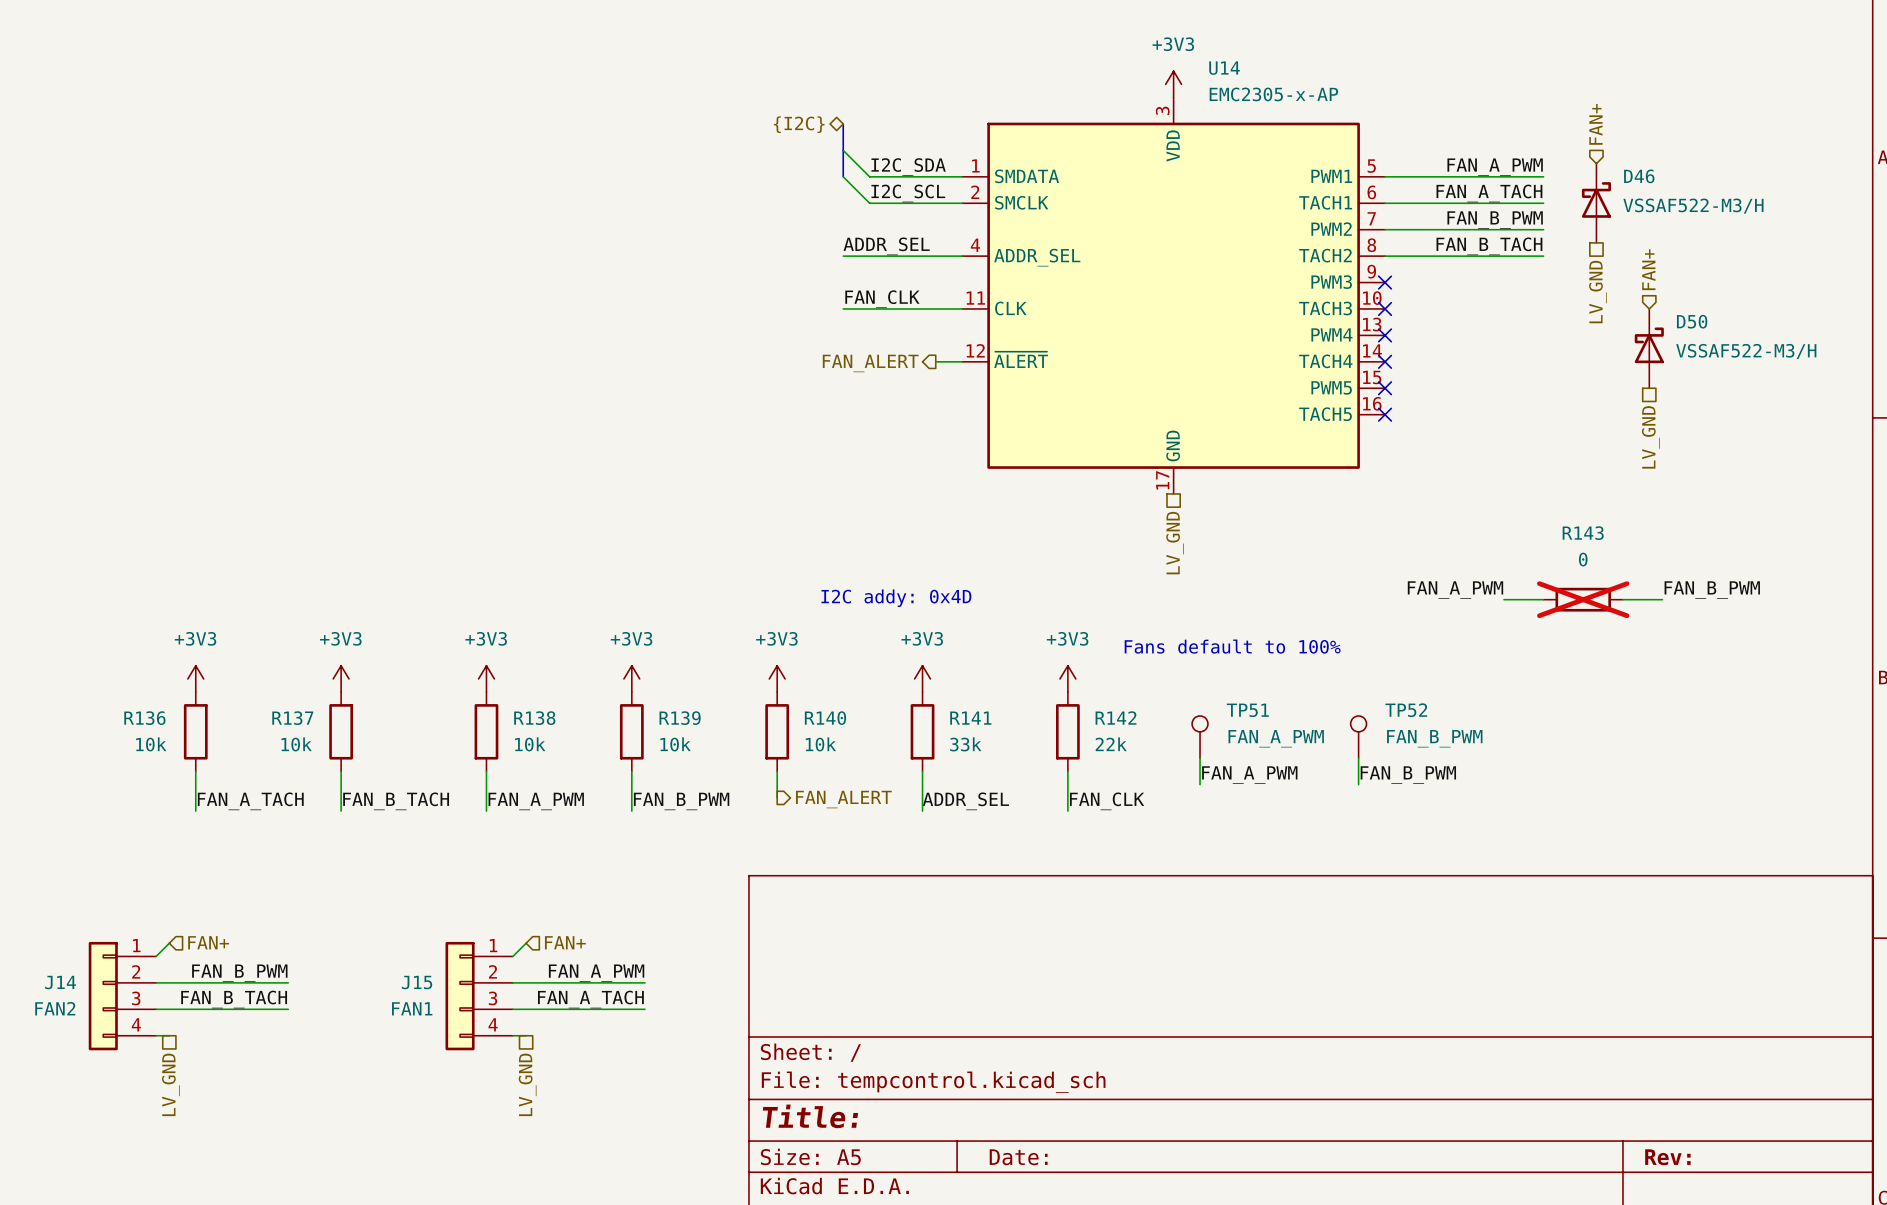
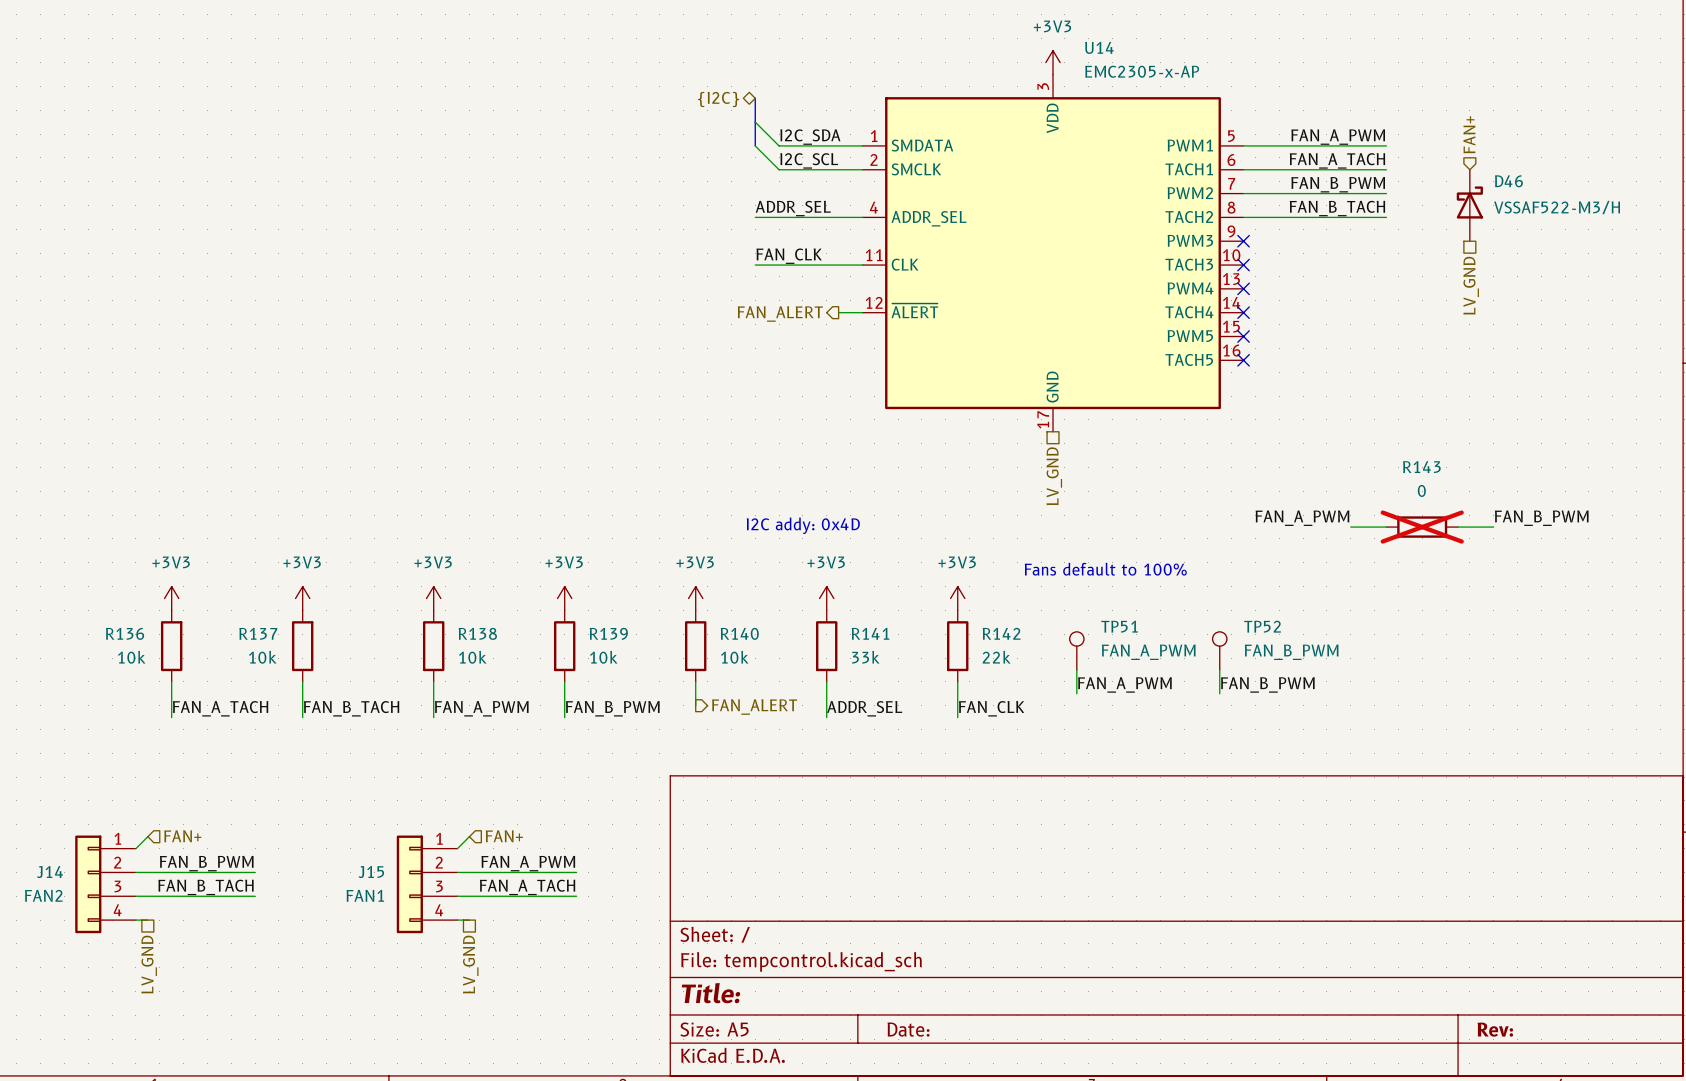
hierarchical label: FAN+ (1595, 124) -> none
hierarchical label: none -> FAN+ (1469, 134)
D46 position: (1596, 203) -> (1469, 205)
hierarchical label: FAN+ (1648, 269) -> none
hierarchical label: LV_GND (1597, 292) -> none
hierarchical label: none -> LV_GND (1471, 285)
D50: VSSAF522-M3/H (1649, 348) -> none
hierarchical label: LV_GND (1650, 437) -> none

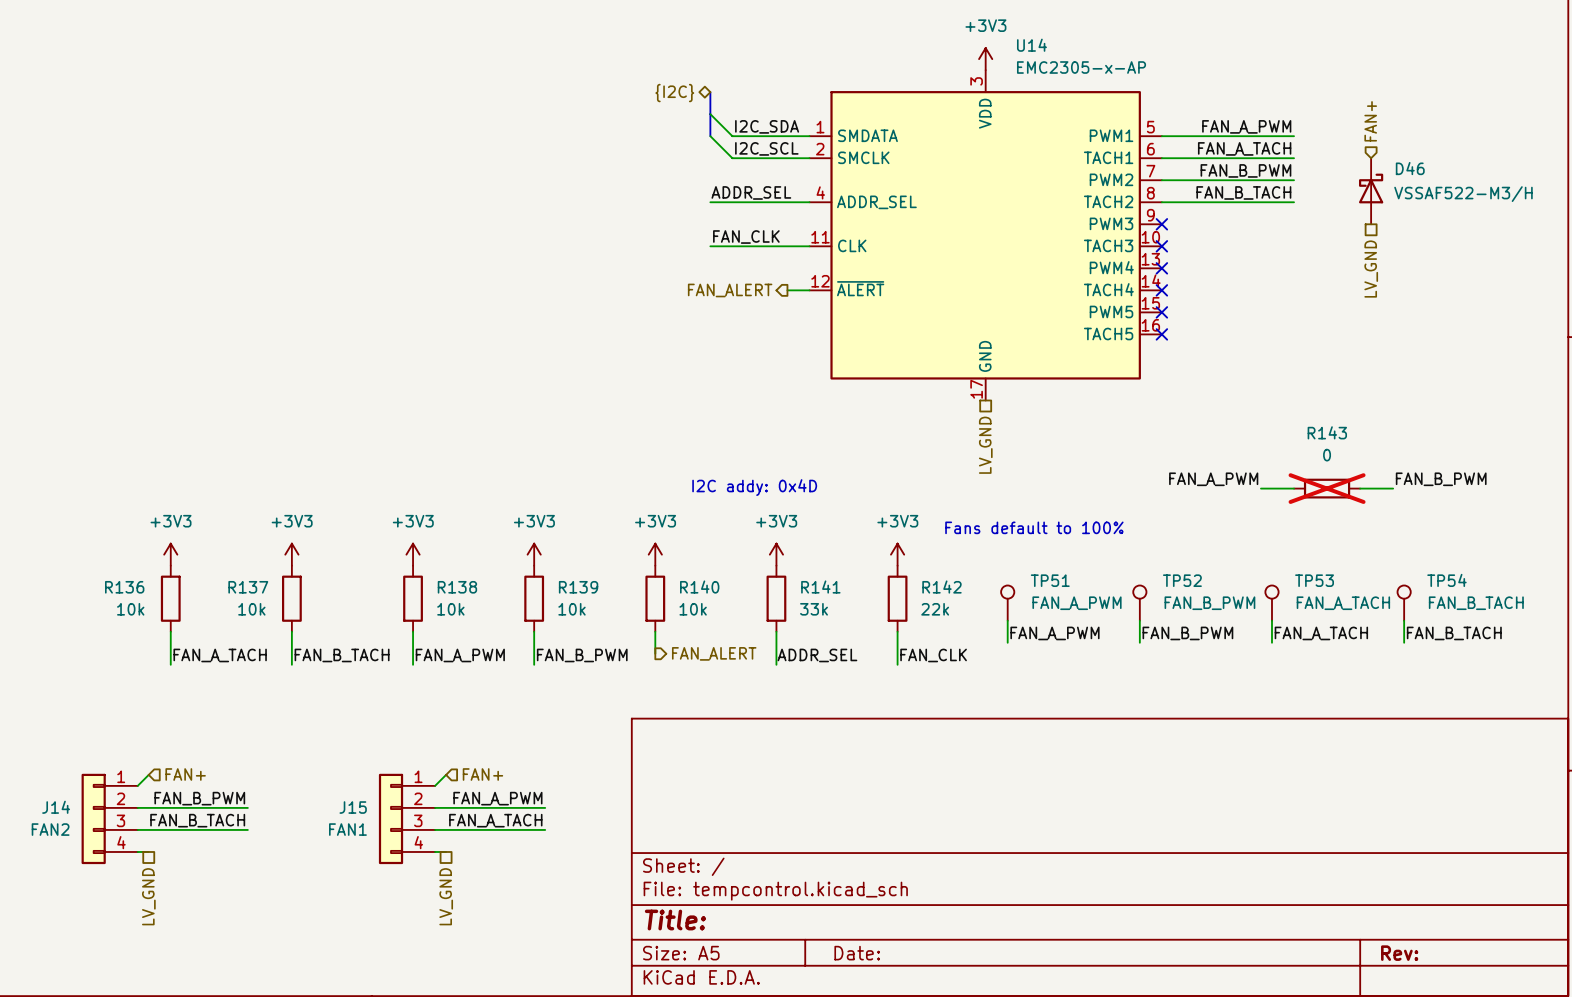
TP53: none -> FAN_A_TACH (1271, 603)
TP54: none -> FAN_B_TACH (1404, 603)
wire: none -> (1271, 620) (1271, 642)
wire: none -> (1404, 620) (1404, 642)
label: none -> FAN_A_TACH (1321, 633)
label: none -> FAN_B_TACH (1454, 633)

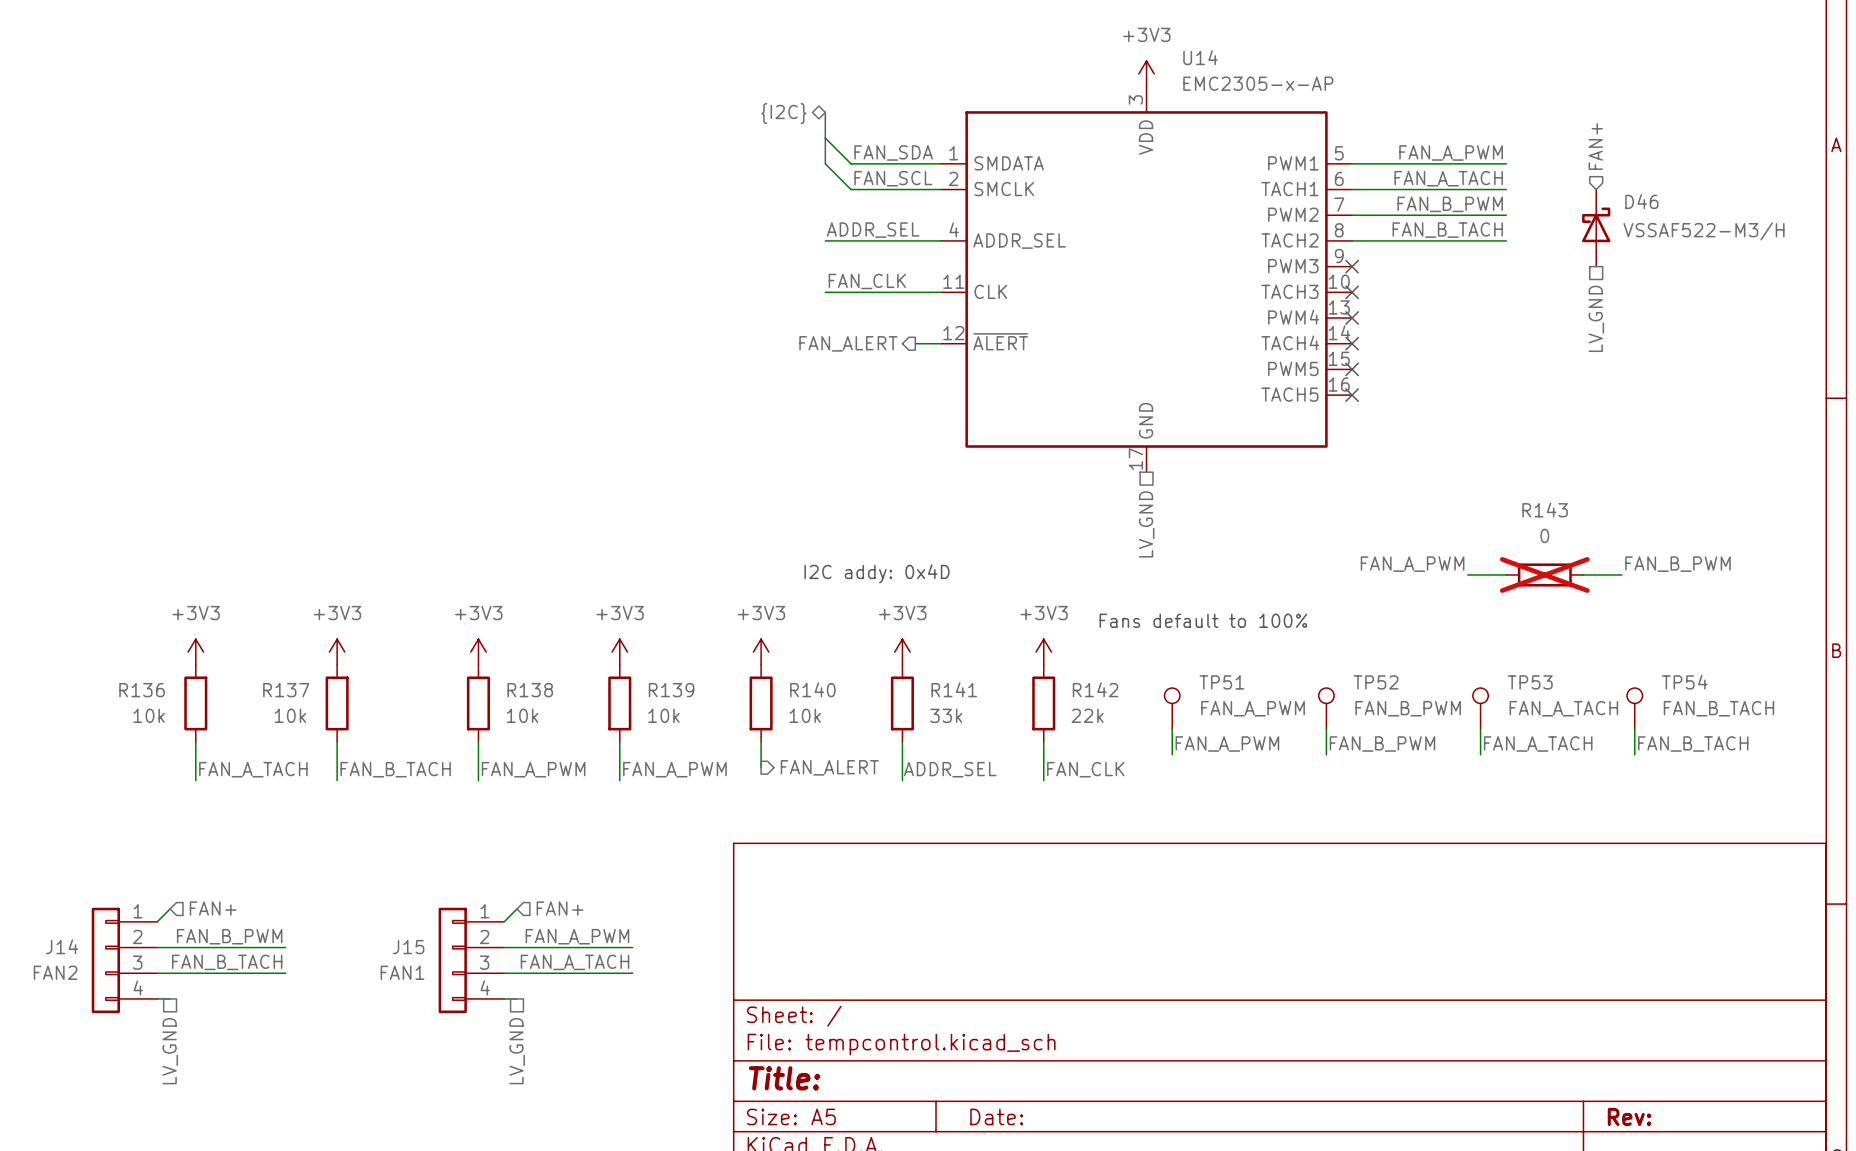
label: I2C_SDA (767, 126) -> FAN_SDA (893, 152)
label: I2C_SCL (766, 148) -> FAN_SCL (893, 178)
label: FAN_B_PWM (582, 655) -> FAN_A_PWM (674, 769)

